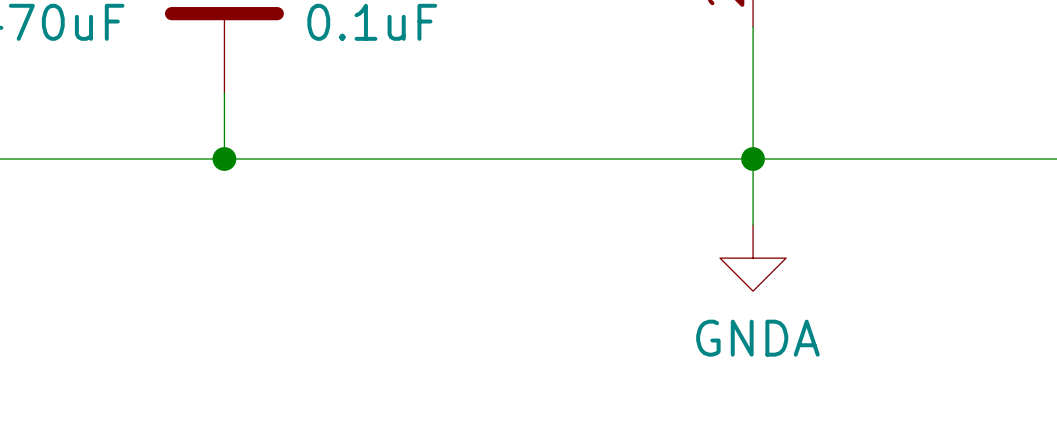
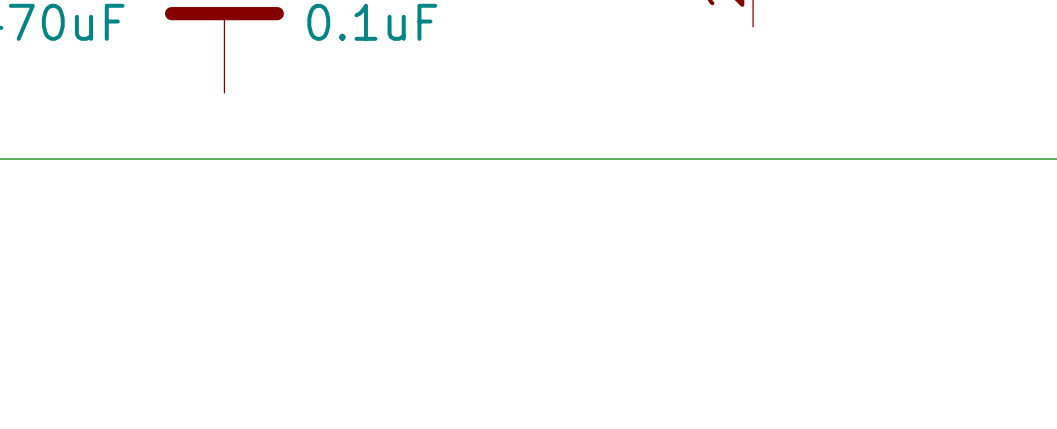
wire: (753, 26) (753, 225) -> none
wire: (224, 92) (224, 159) -> none
junction: (224, 159) -> none
junction: (753, 159) -> none
power symbol: GNDA (753, 258) -> none

